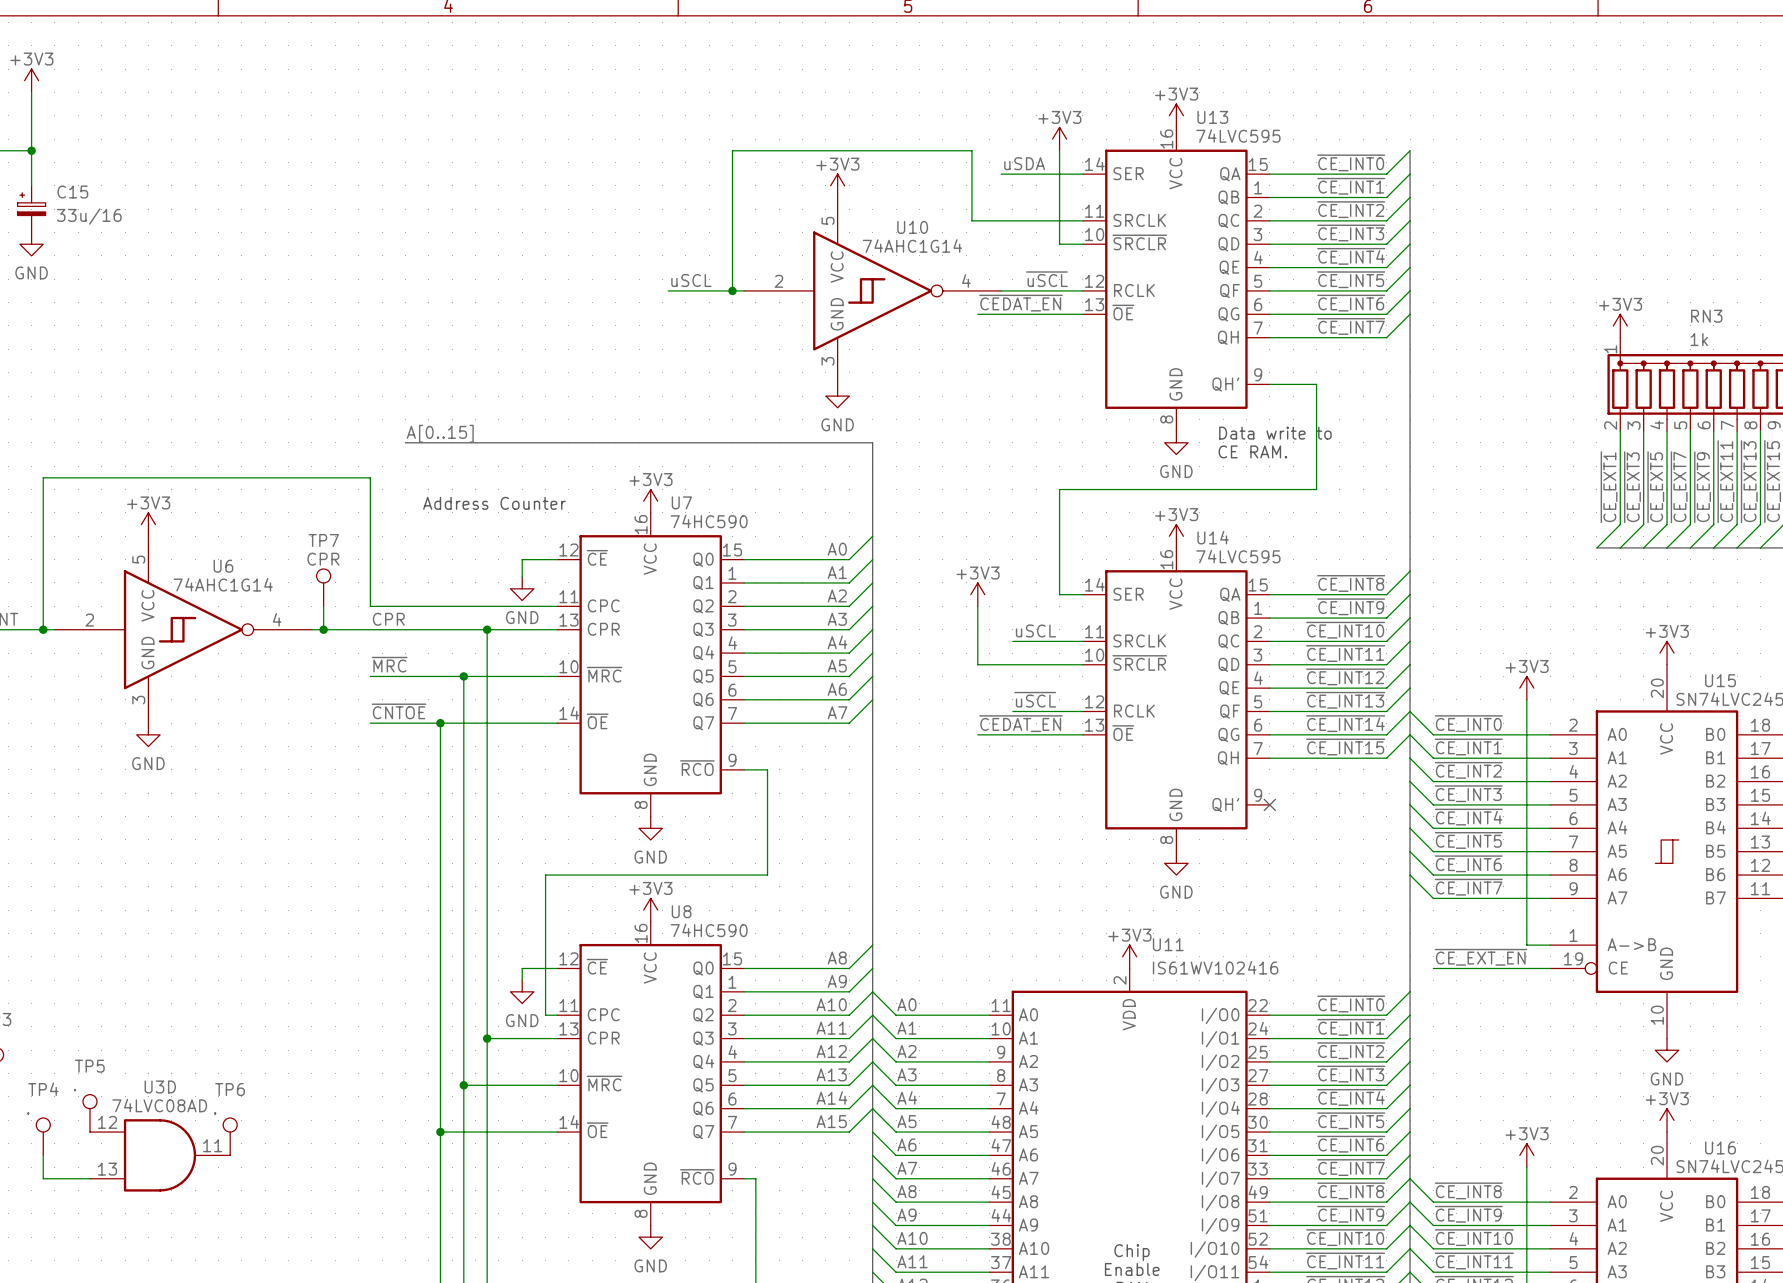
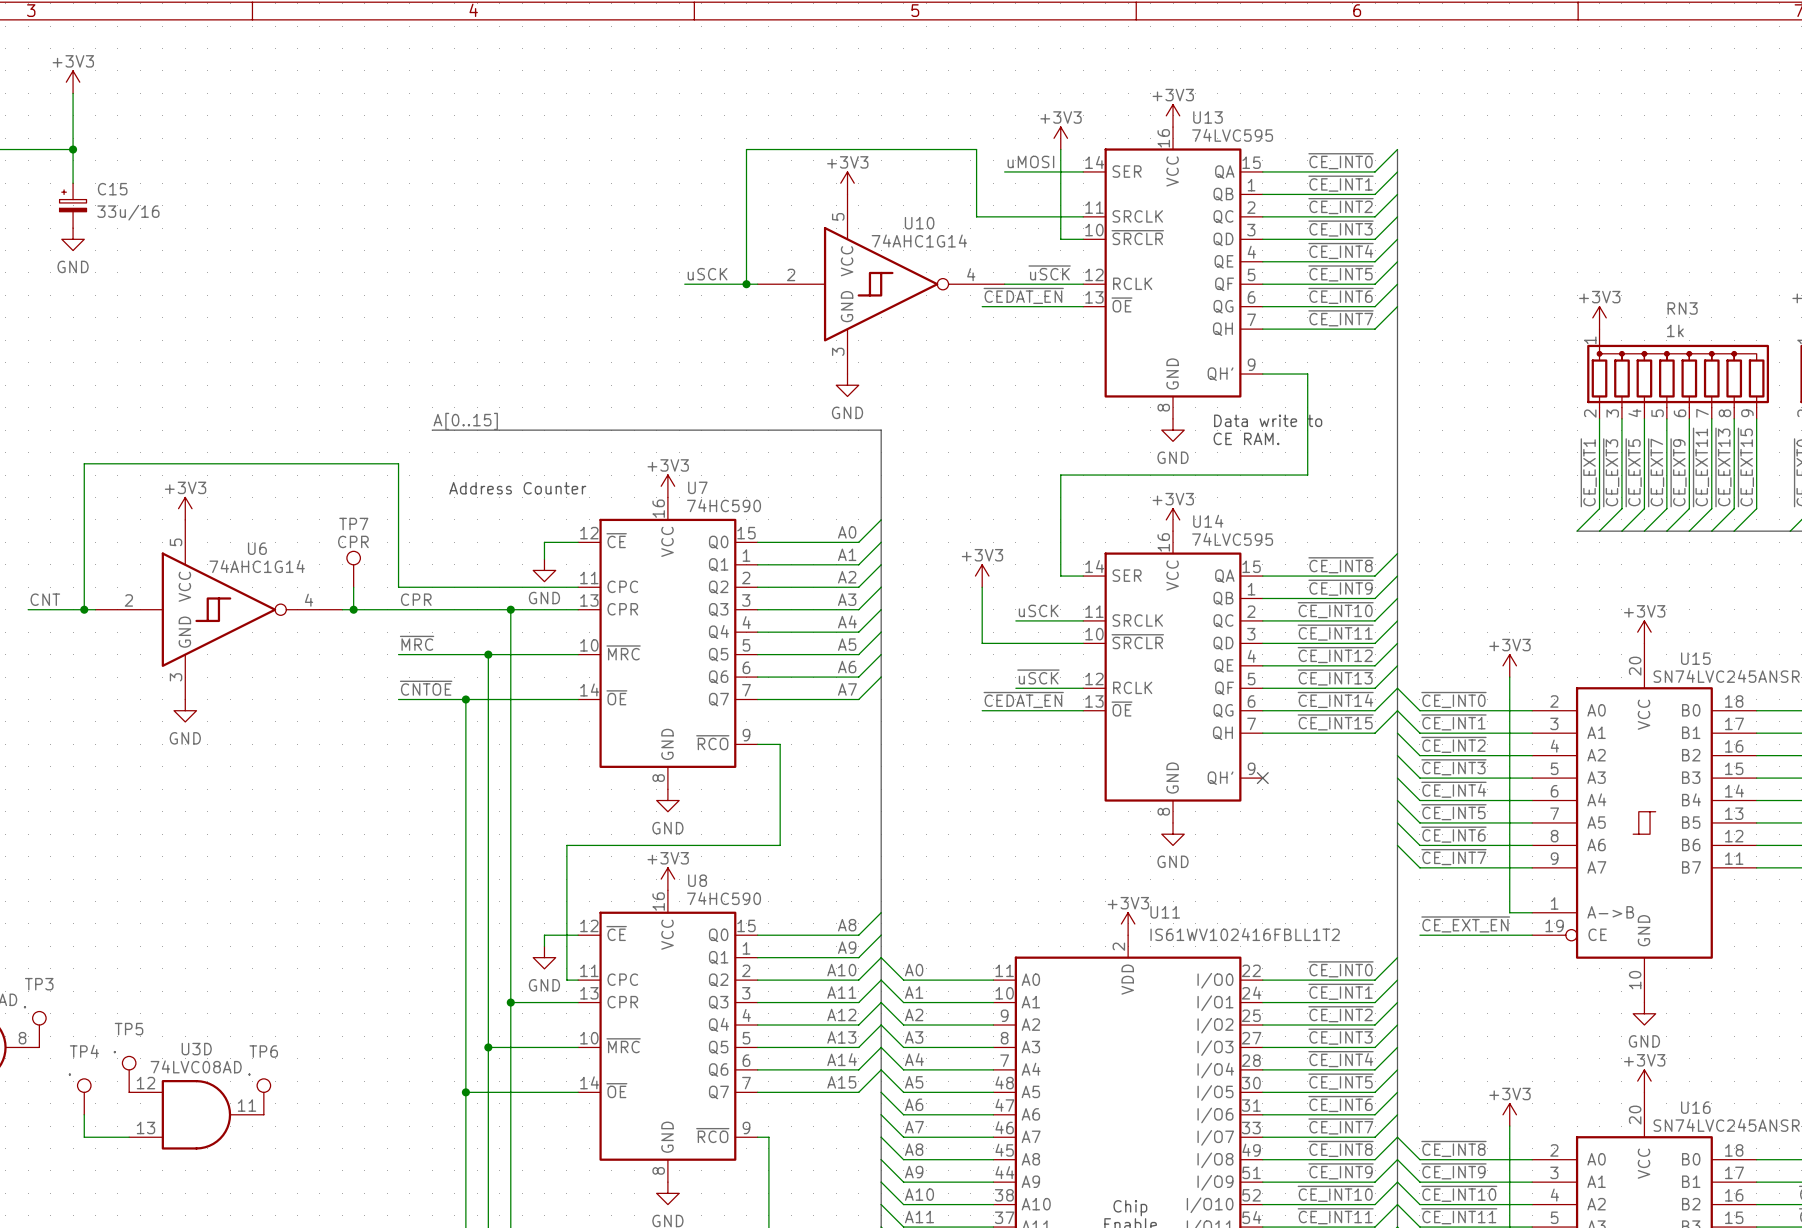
label: uSDA (1024, 163) -> uMOSI (1030, 161)
label: ~{uSCL} (1046, 279) -> ~{uSCK} (1049, 272)
label: uSCL (691, 280) -> uSCK (707, 274)
label: uSCL (1036, 630) -> uSCK (1038, 610)
label: ~{uSCL} (1035, 699) -> ~{uSCK} (1038, 676)
U11 value: IS61WV102416 (1215, 967) -> IS61WV102416FBLL1T2 (1245, 934)

